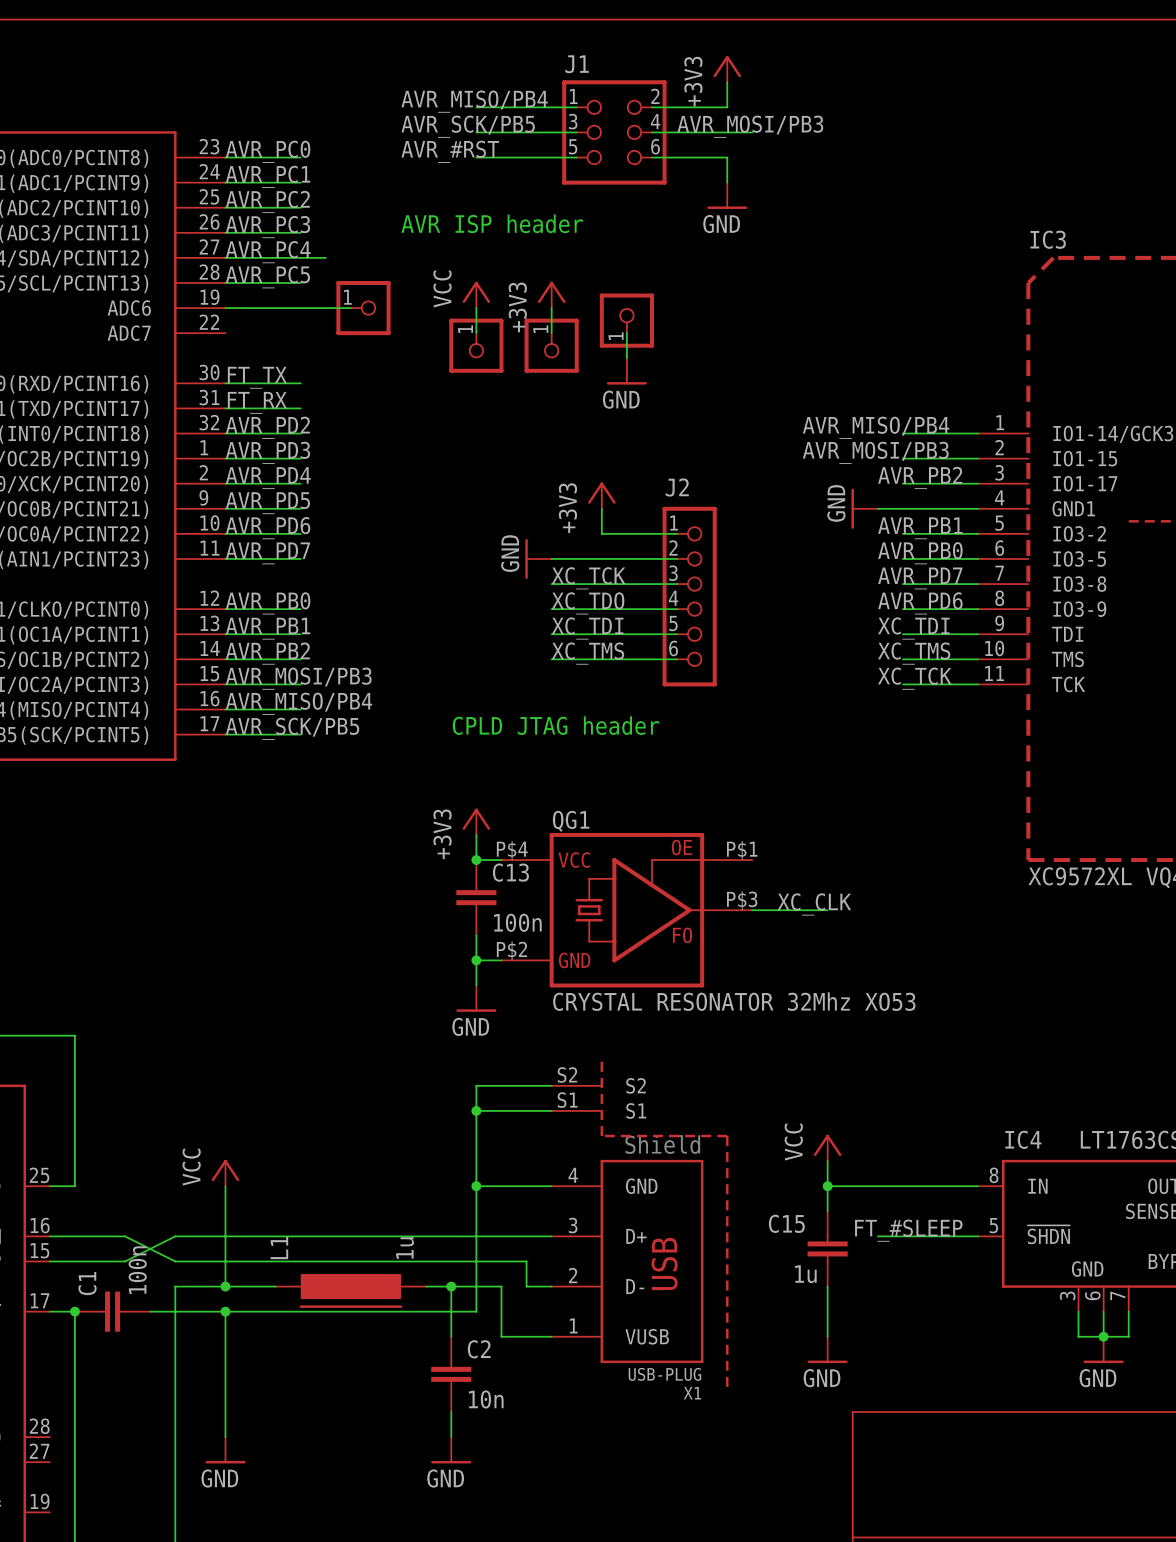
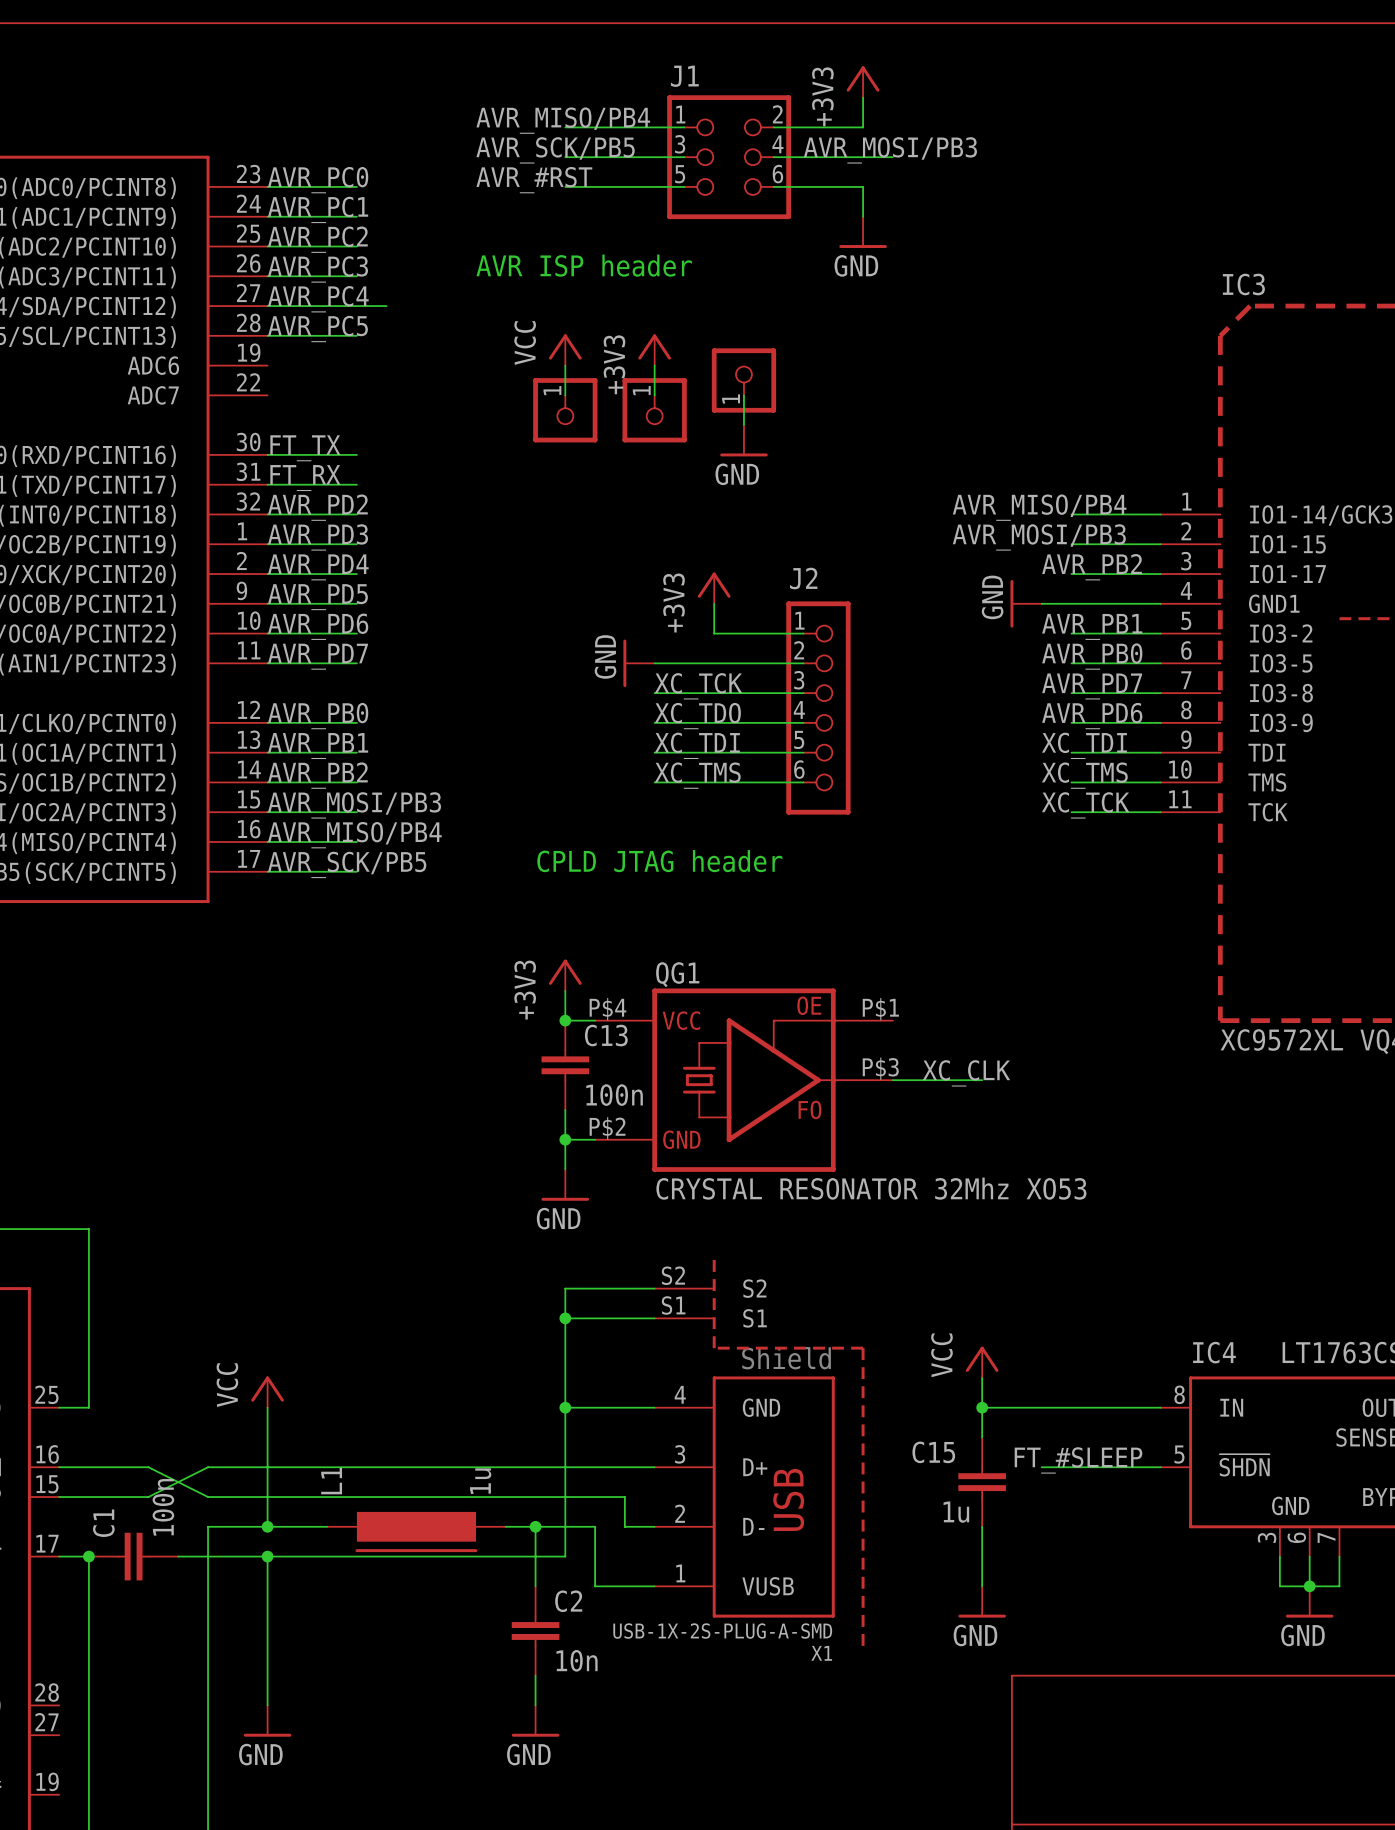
wire: (225, 308) (350, 308) -> none
part: (363, 308) -> none
X1 value: USB-PLUG (664, 1374) -> USB-1X-2S-PLUG-A-SMD (722, 1631)

